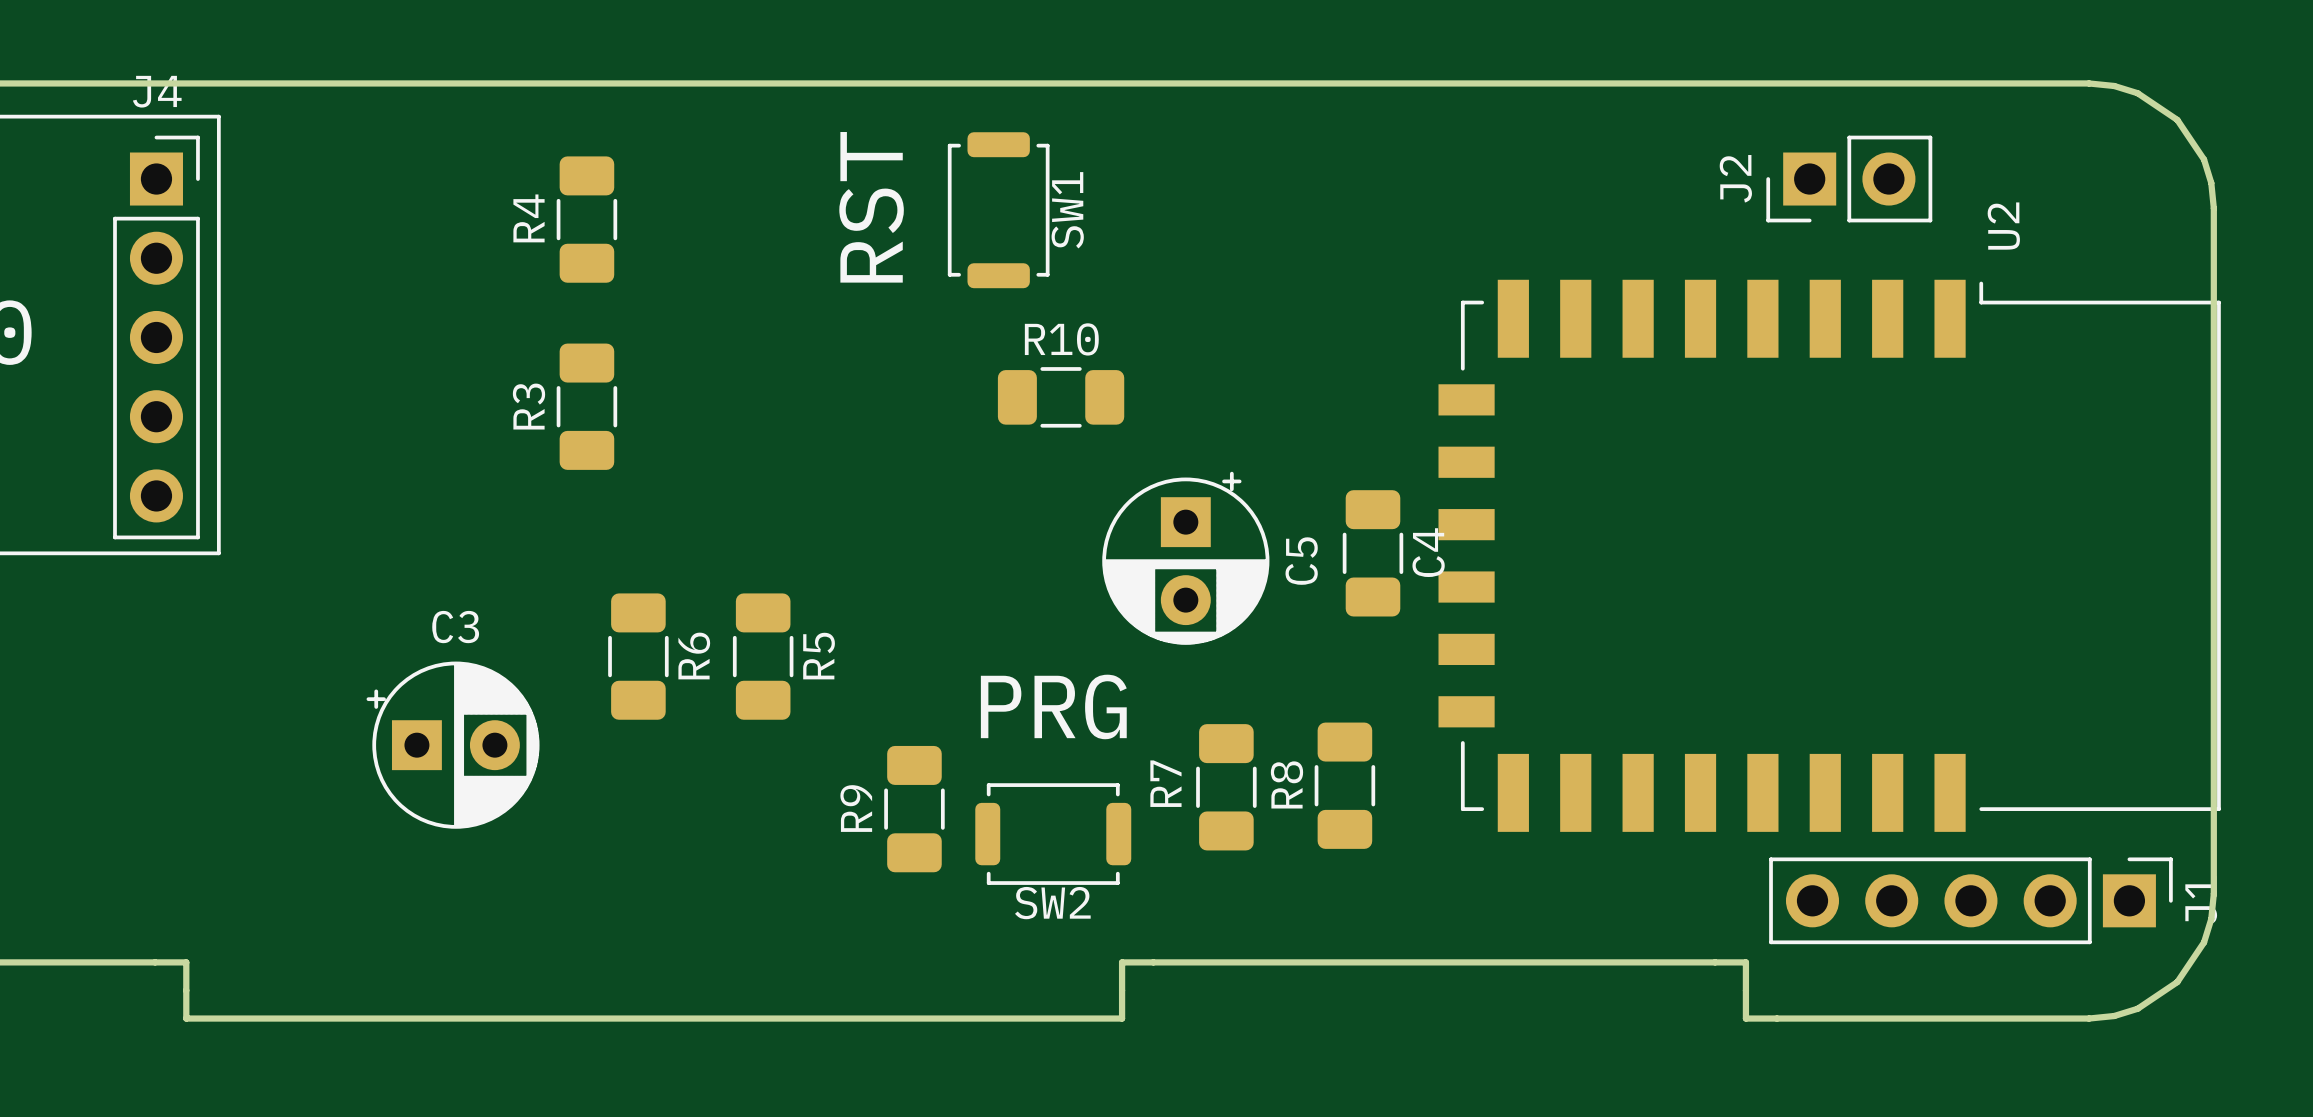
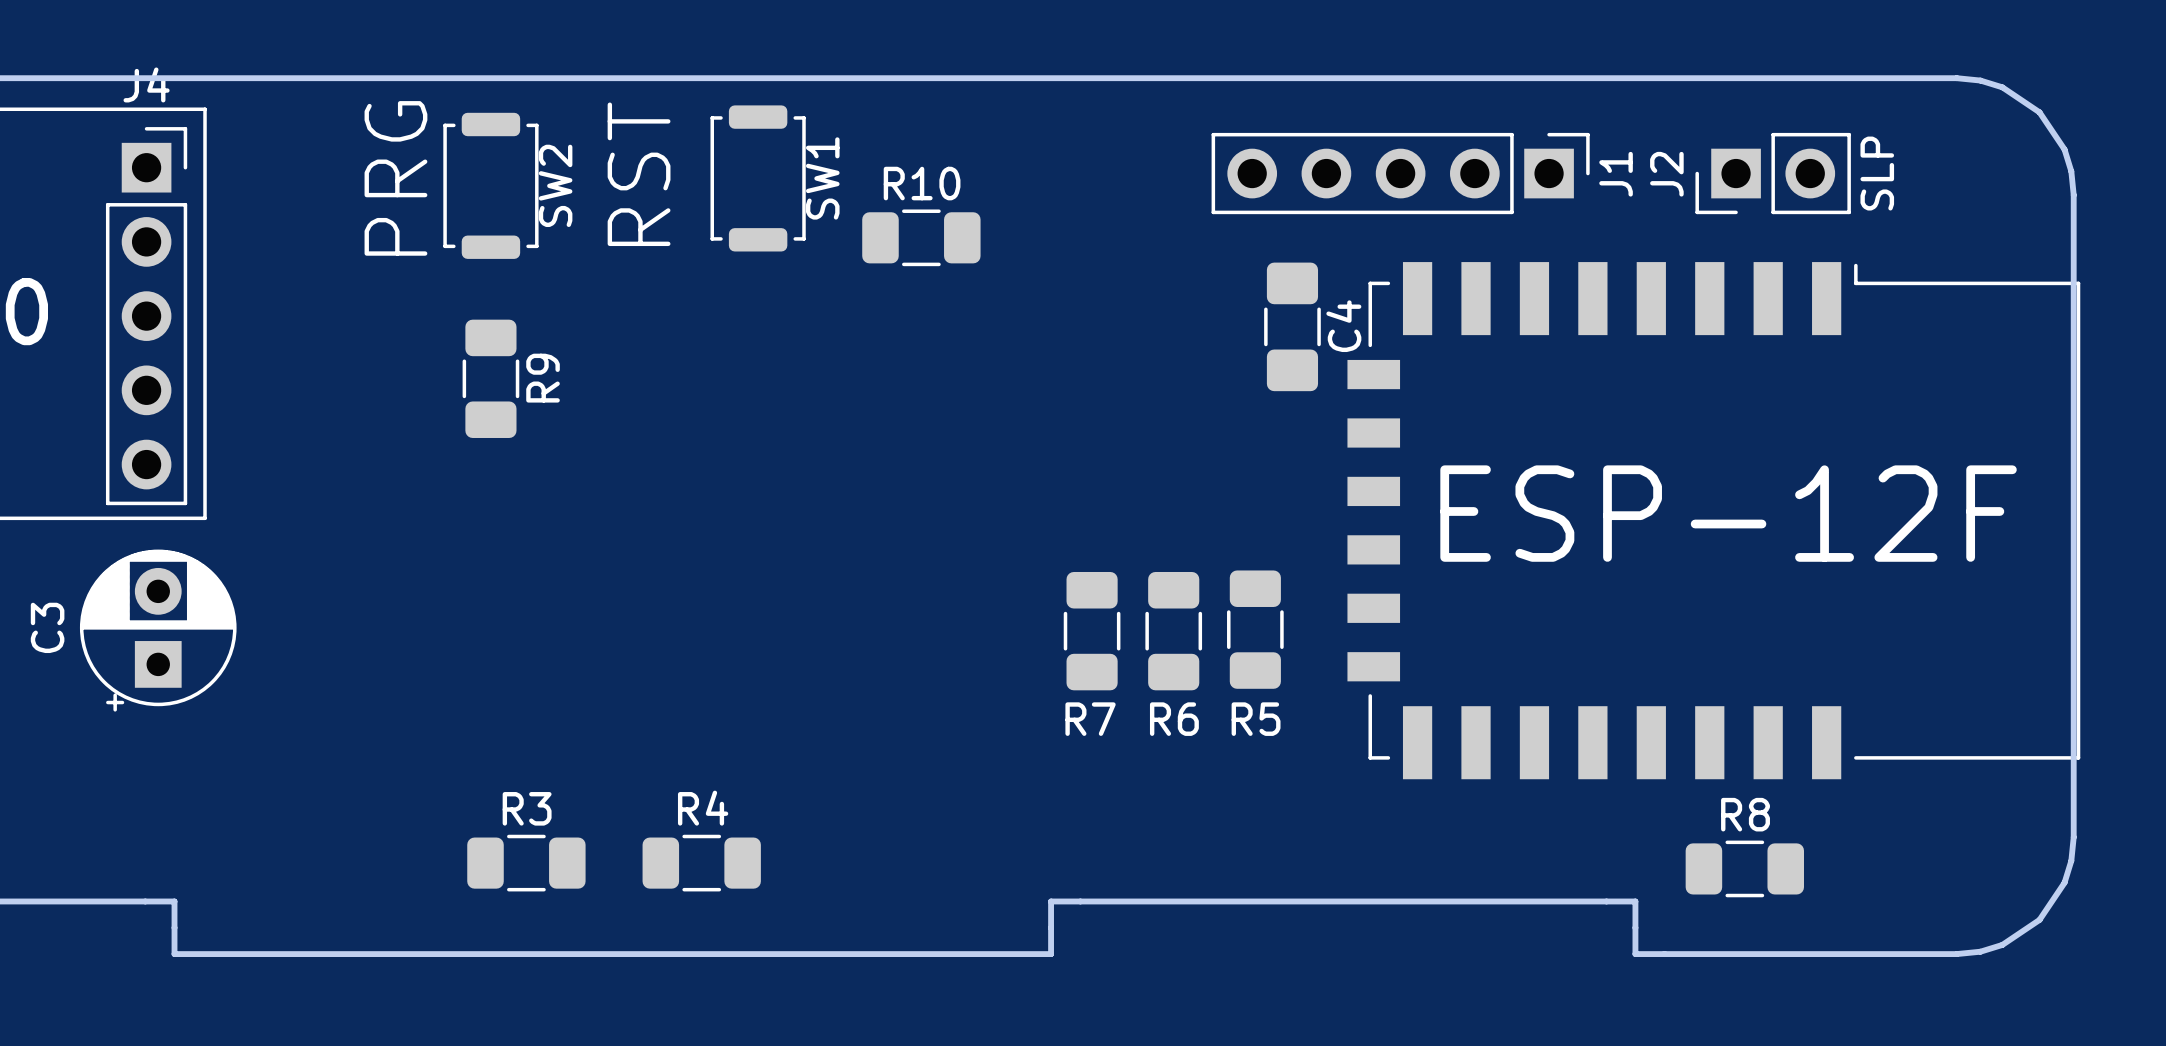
J2 position: (1849, 179) -> (1773, 173)
J2 value: none -> SLP (1877, 173)
SW1 position: (998, 210) -> (758, 178)
R4 rotation: 0° (586, 219) -> 90° clockwise (701, 863)
R4 position: (586, 219) -> (701, 863)
U2 name: U2 (2003, 226) -> none
R10 position: (1061, 397) -> (921, 237)
R3 rotation: 0° (586, 406) -> 90° clockwise (526, 863)
R3 position: (586, 406) -> (526, 863)
C4 footprint: [1342, 490, 1404, 617] -> [1264, 262, 1321, 392]
U2 value: none -> ESP-12F (1728, 513)
C5: (1185, 558) -> none
R6 position: (638, 656) -> (1173, 631)
R6 name rotation: 0° (694, 656) -> 90° clockwise (1174, 719)
R6 name position: R6 (694, 656) -> R6 (1174, 719)
R5 position: (763, 656) -> (1255, 629)
R5 name rotation: 0° (819, 656) -> 90° clockwise (1256, 719)
R5 name position: R5 (819, 656) -> R5 (1256, 719)
SW2 value position: PRG (1053, 706) -> PRG (395, 178)
C3 rotation: 0° (453, 745) -> 90° counterclockwise (158, 630)
C3 position: (453, 745) -> (158, 630)
R7 name rotation: 0° (1165, 783) -> 90° clockwise (1090, 719)
R8 rotation: 0° (1344, 785) -> 90° clockwise (1744, 868)
R8 position: (1344, 785) -> (1744, 868)
R7 position: (1226, 787) -> (1092, 631)
R9 name position: R9 (856, 808) -> R9 (543, 378)
R9 position: (914, 809) -> (490, 378)
SW2 rotation: 0° (1053, 834) -> 90° clockwise (490, 185)
SW2 position: (1053, 834) -> (490, 185)
J1 position: (1970, 900) -> (1400, 173)
SW2 name position: SW2 (1052, 903) -> SW2 (555, 185)

